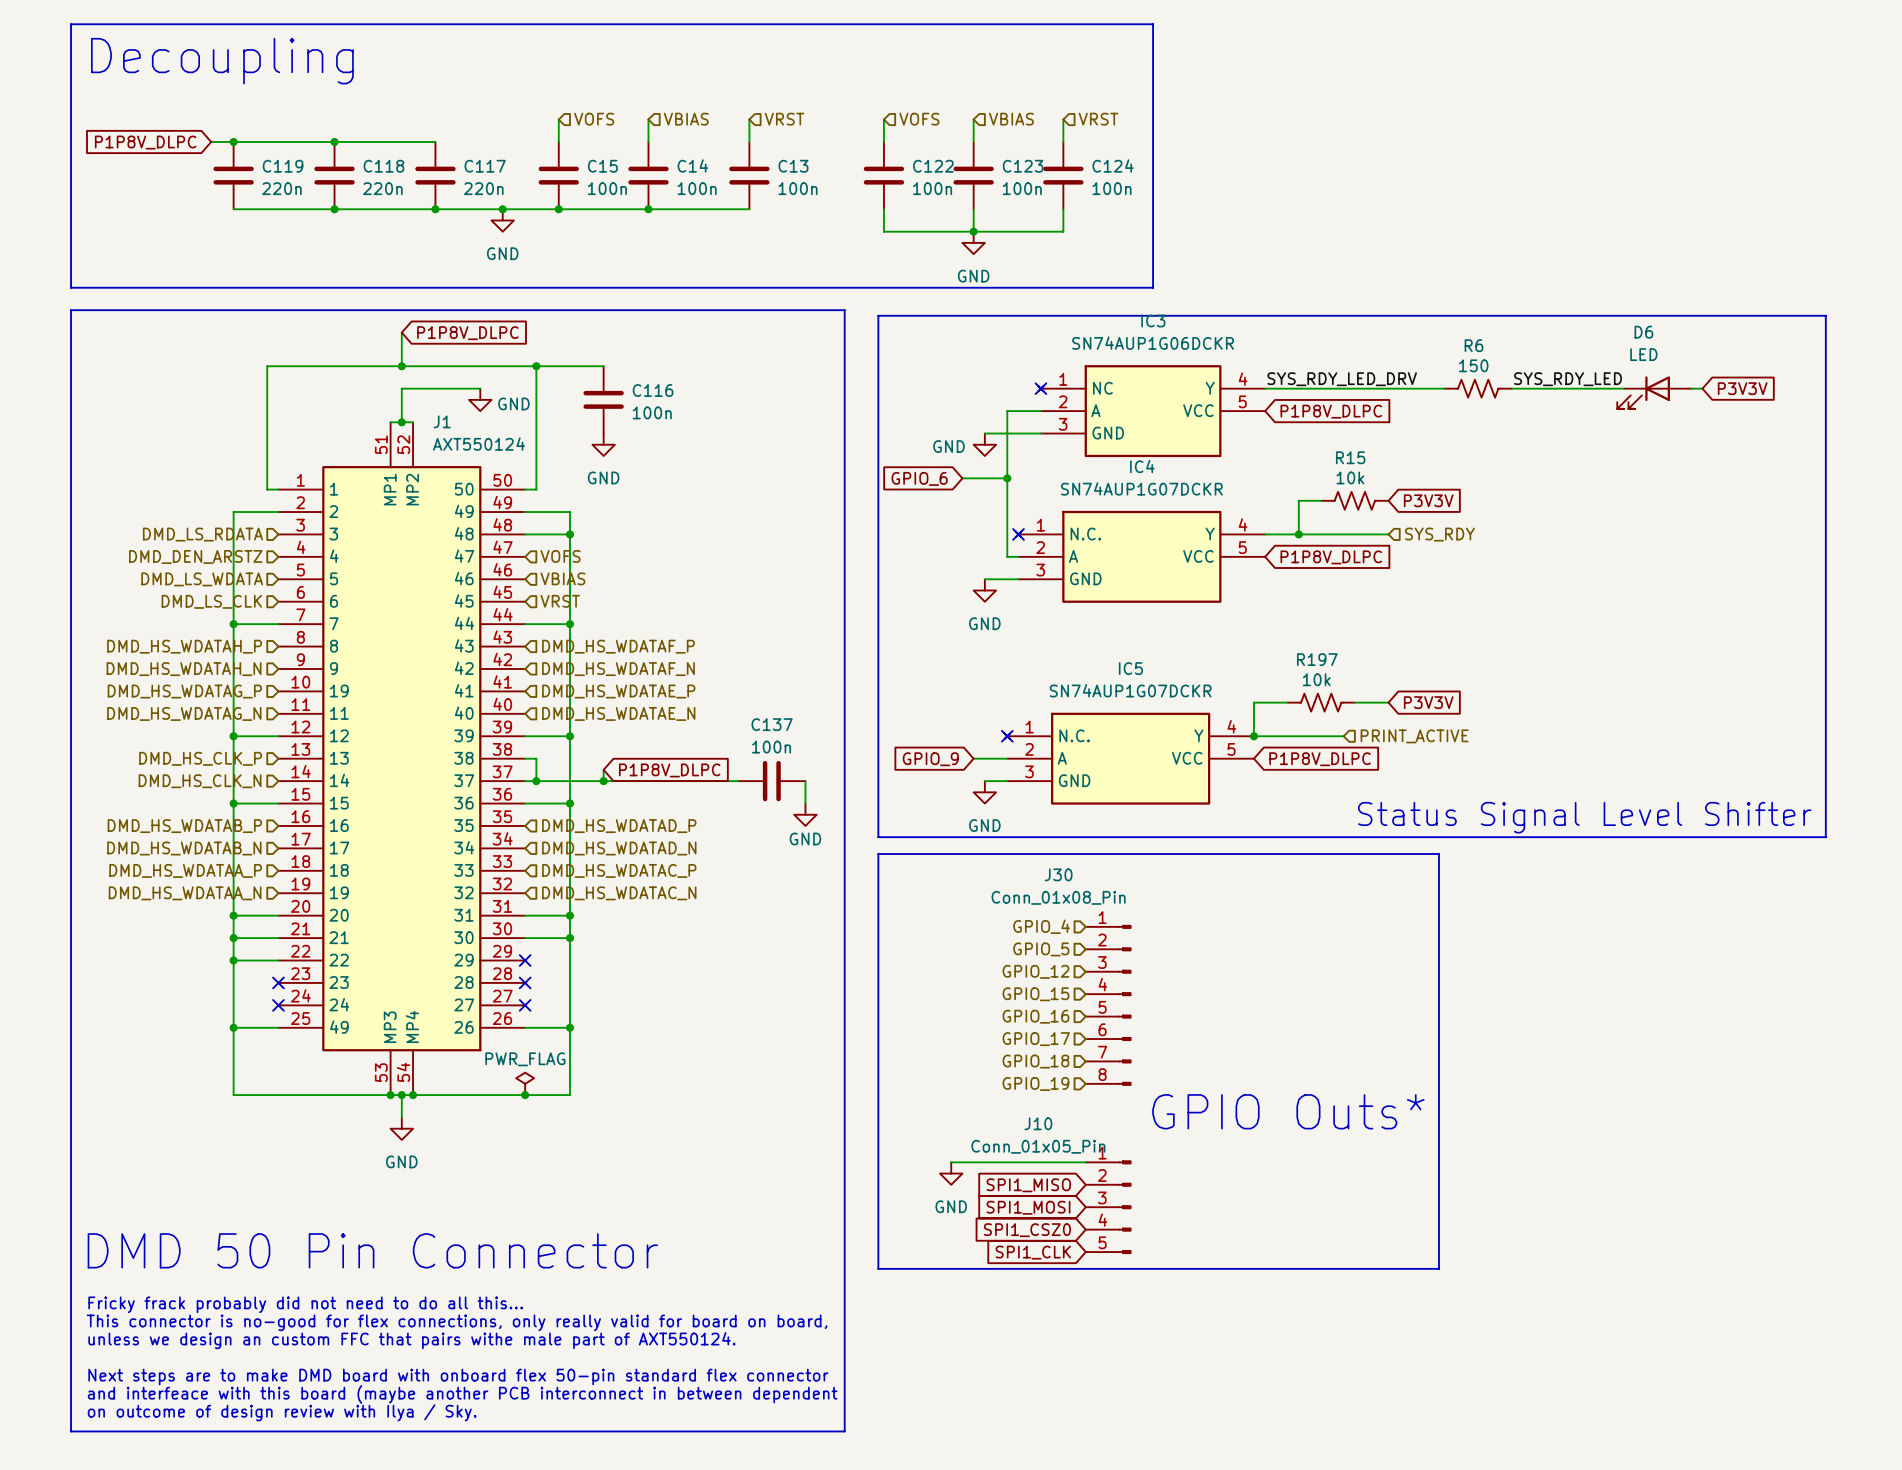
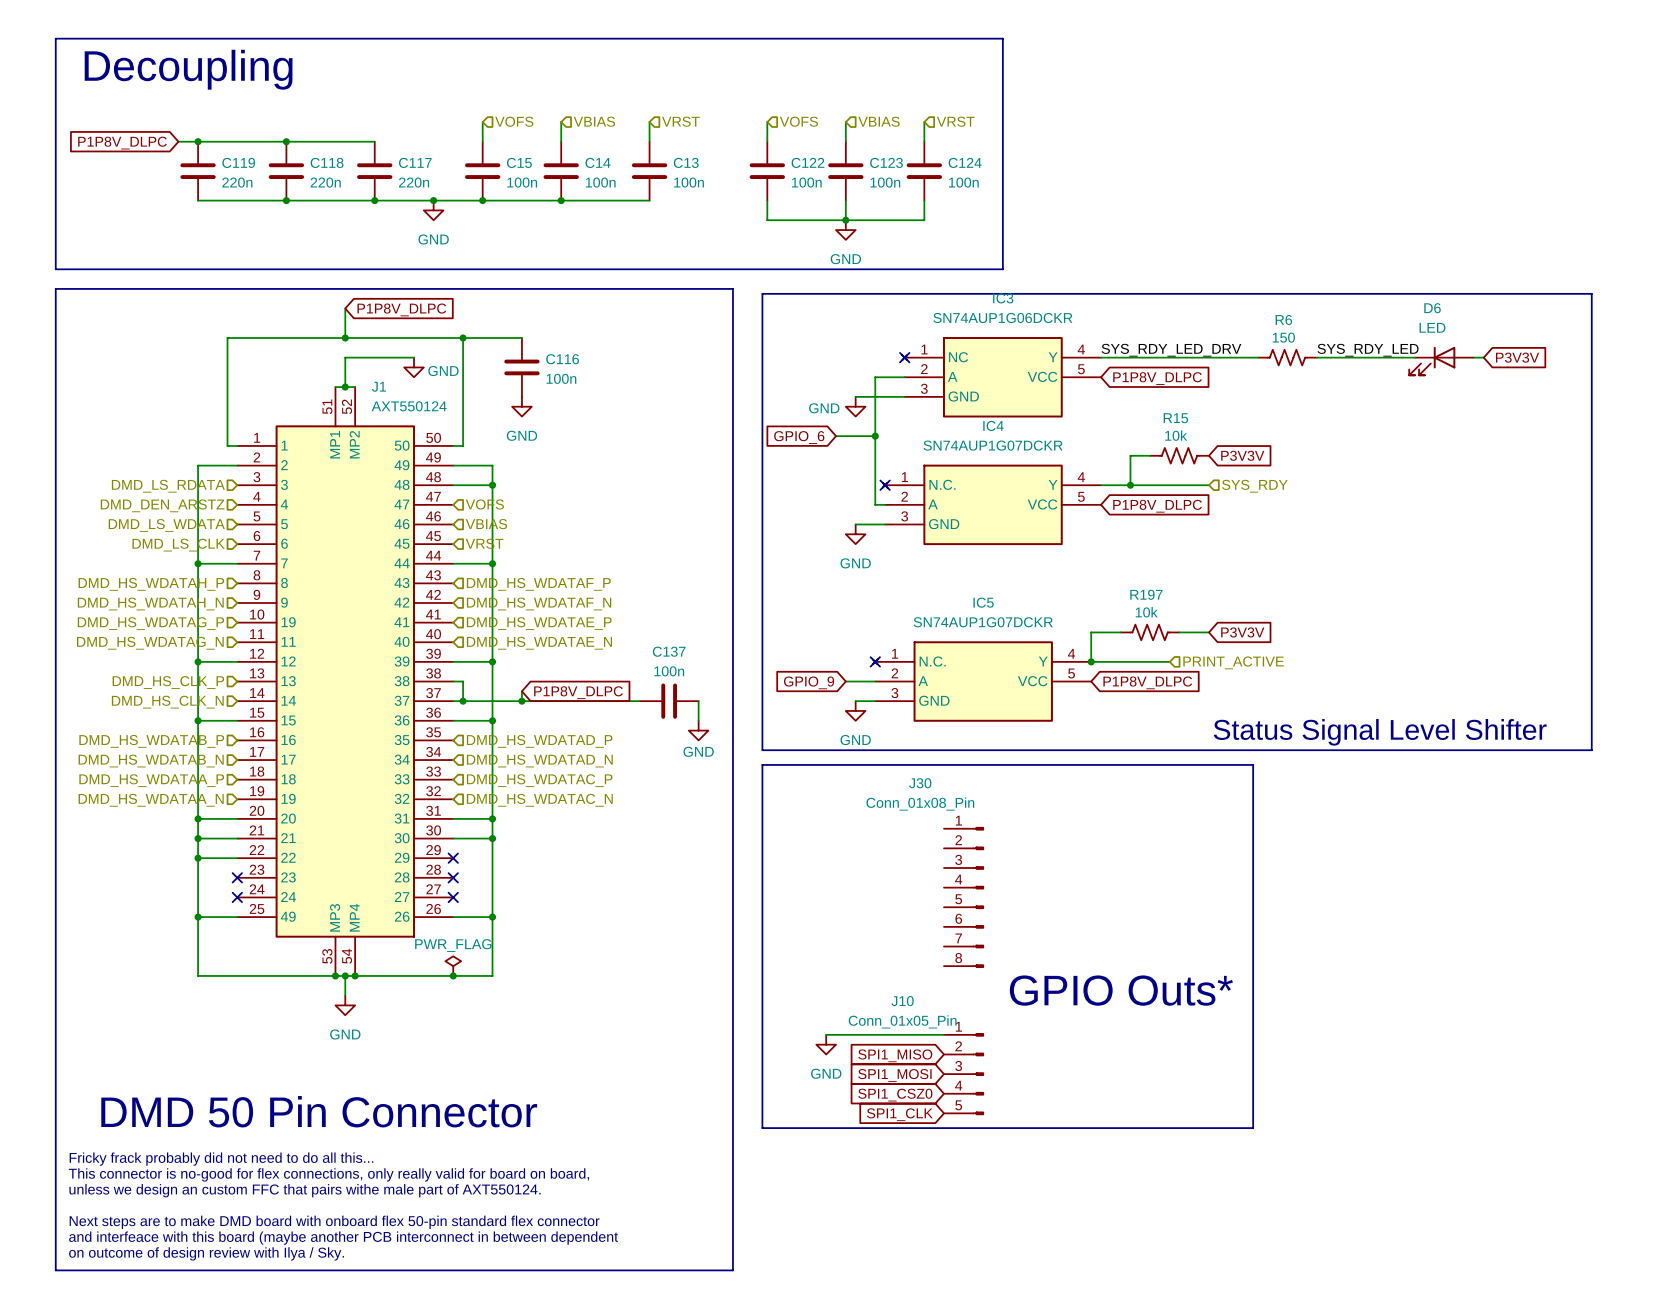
hierarchical label: GPIO_4 (1041, 926) -> none
hierarchical label: GPIO_5 (1041, 949) -> none
hierarchical label: GPIO_12 (1035, 971) -> none
hierarchical label: GPIO_15 (1035, 994) -> none
hierarchical label: GPIO_16 (1035, 1016) -> none
hierarchical label: GPIO_17 (1036, 1039) -> none
hierarchical label: GPIO_18 (1035, 1061) -> none
hierarchical label: GPIO_19 (1035, 1083) -> none

